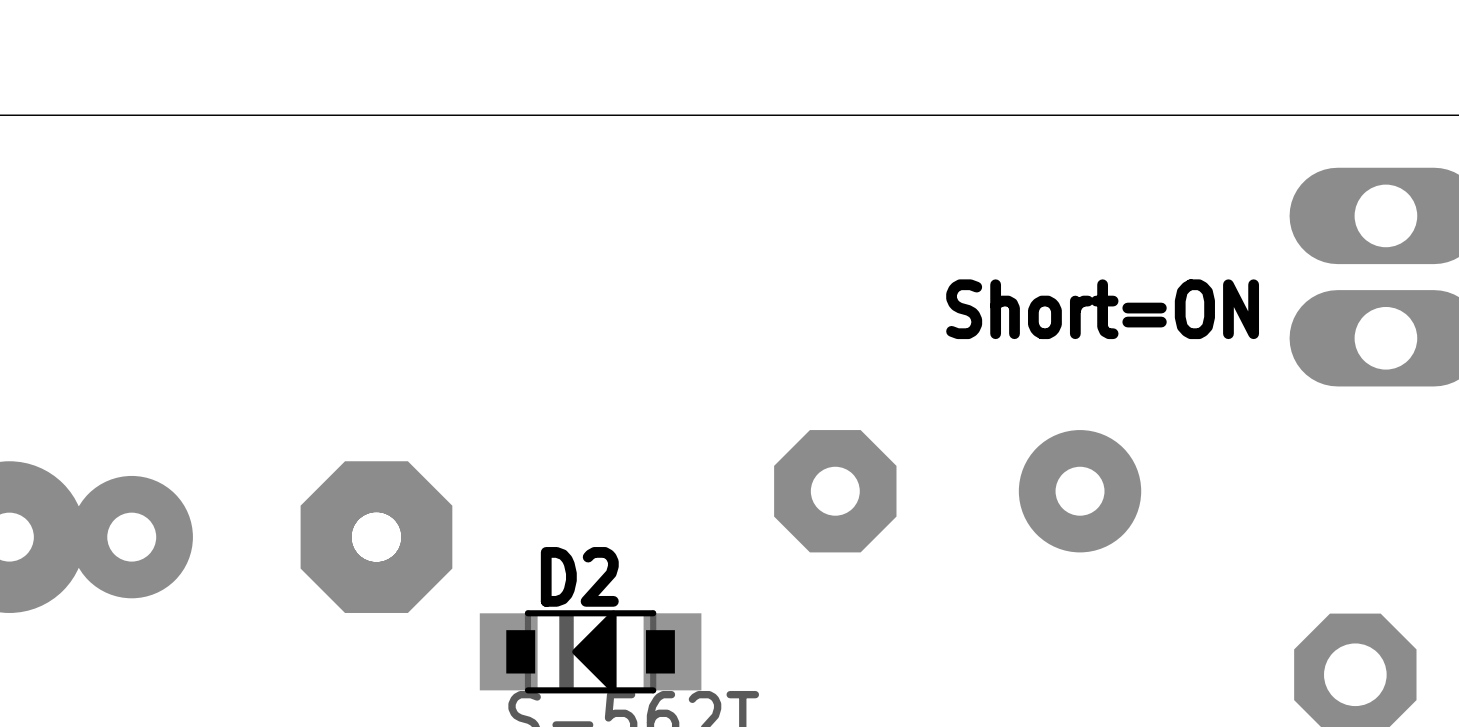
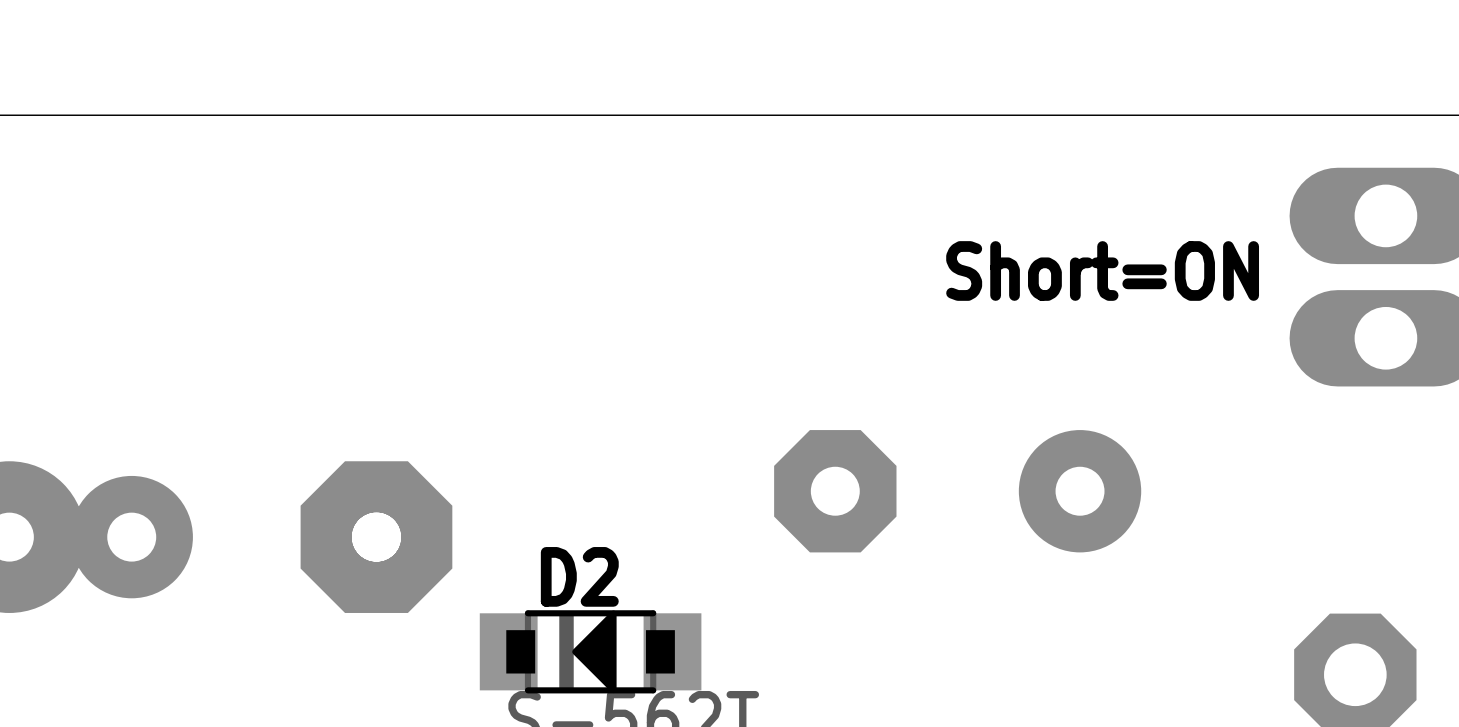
text position: Short=ON (1102, 309) -> Short=ON (1102, 270)

